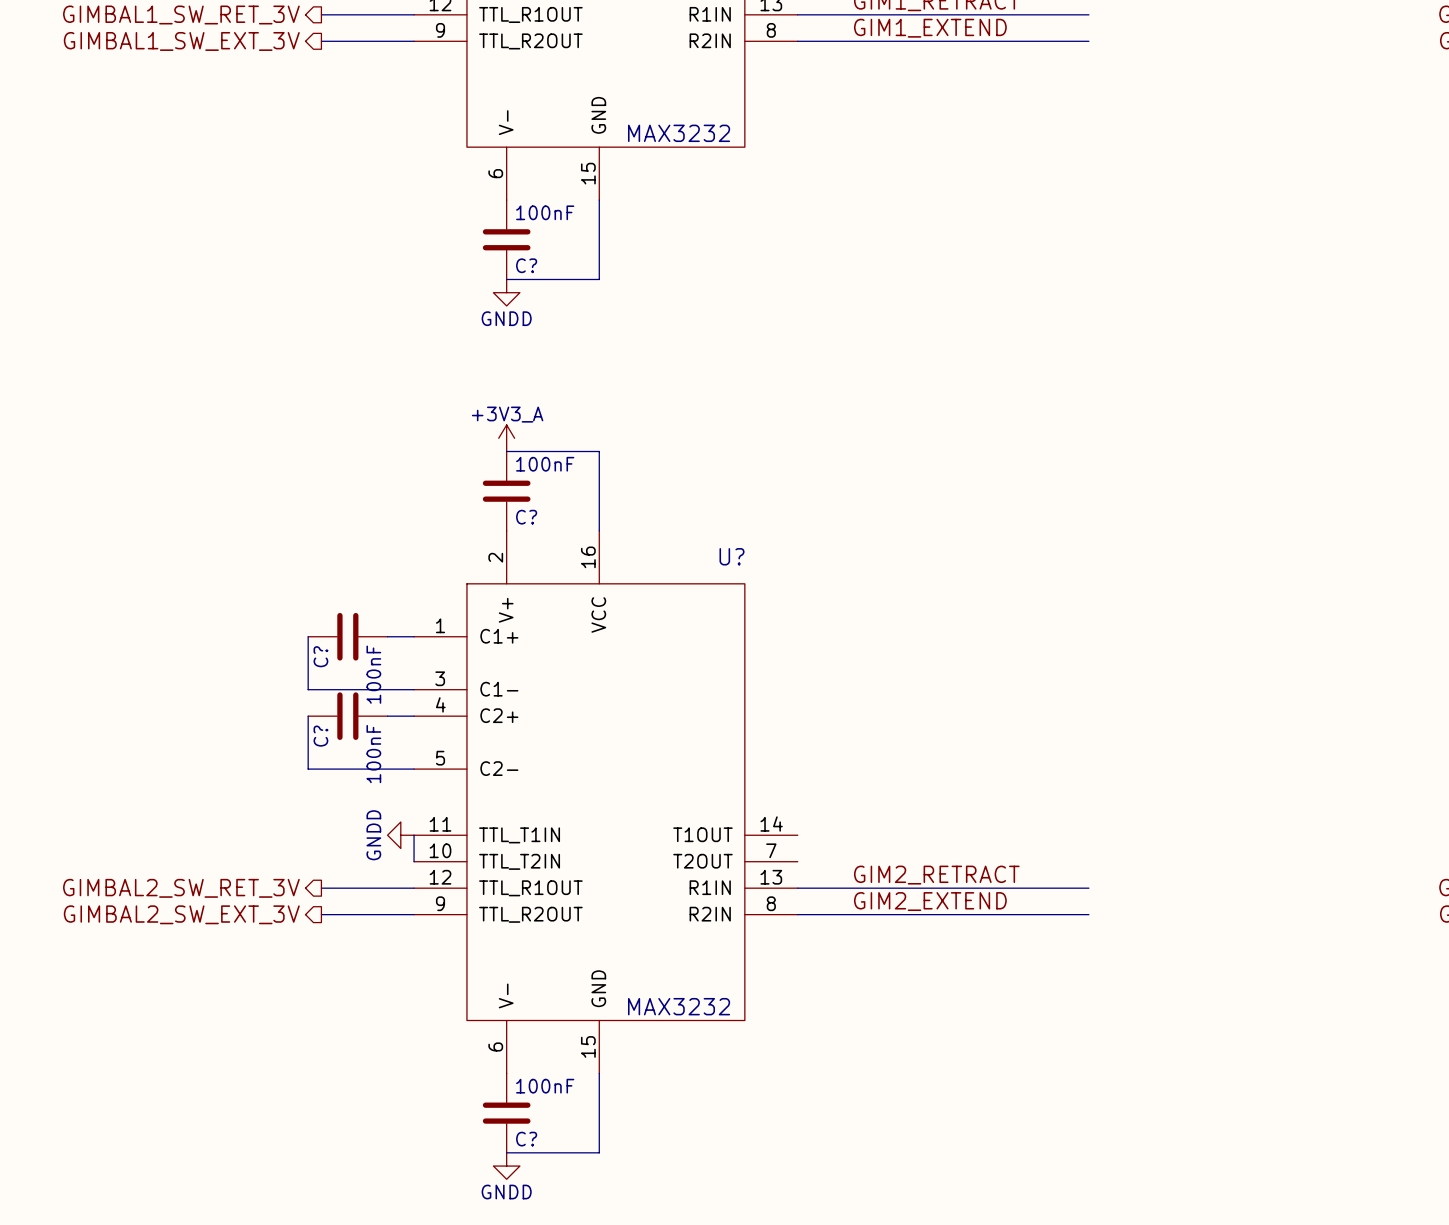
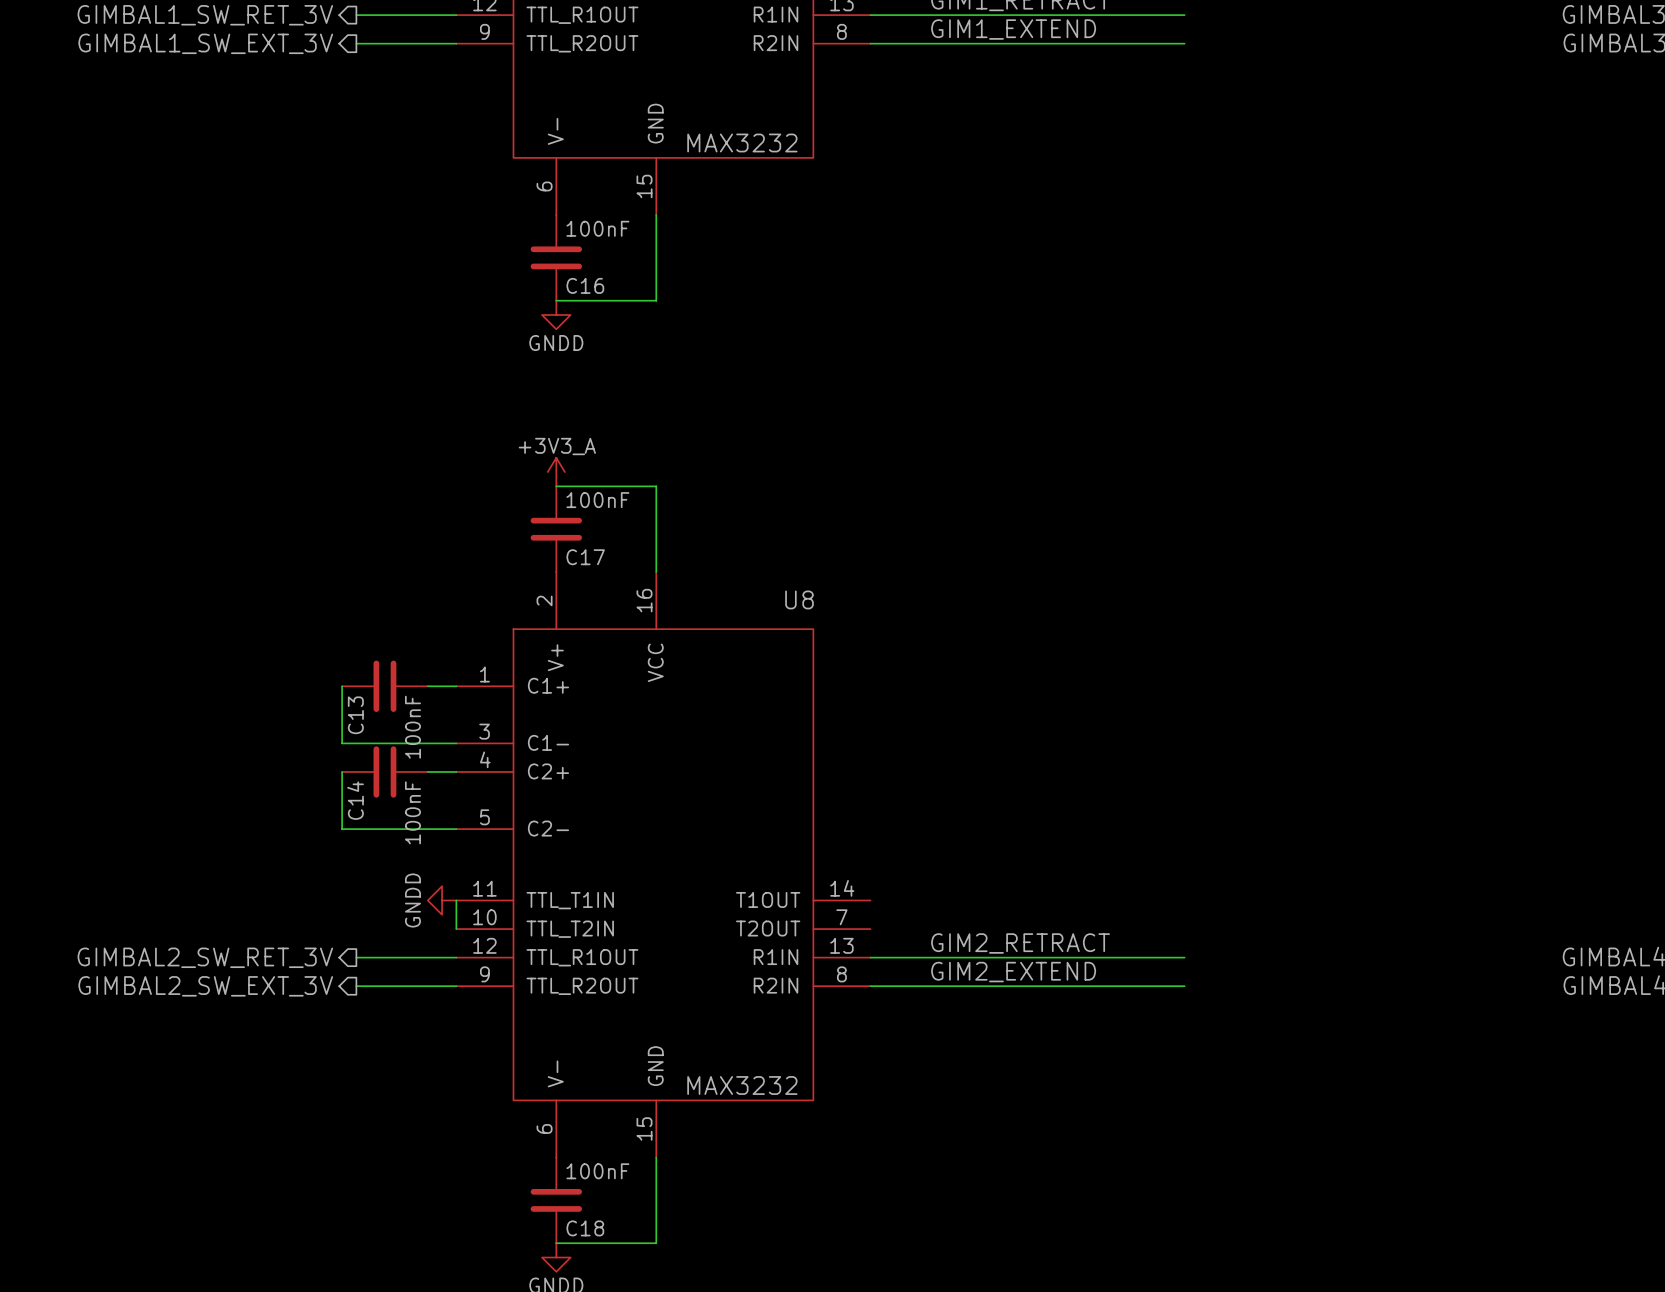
C? name: C? (526, 265) -> C16 (585, 285)
C? name: C? (526, 517) -> C17 (585, 557)
U? name: U? (731, 556) -> U8 (799, 599)
C? name: C? (320, 656) -> C13 (355, 715)
C? name: C? (320, 736) -> C14 (355, 800)
C? name: C? (526, 1139) -> C18 (585, 1228)

